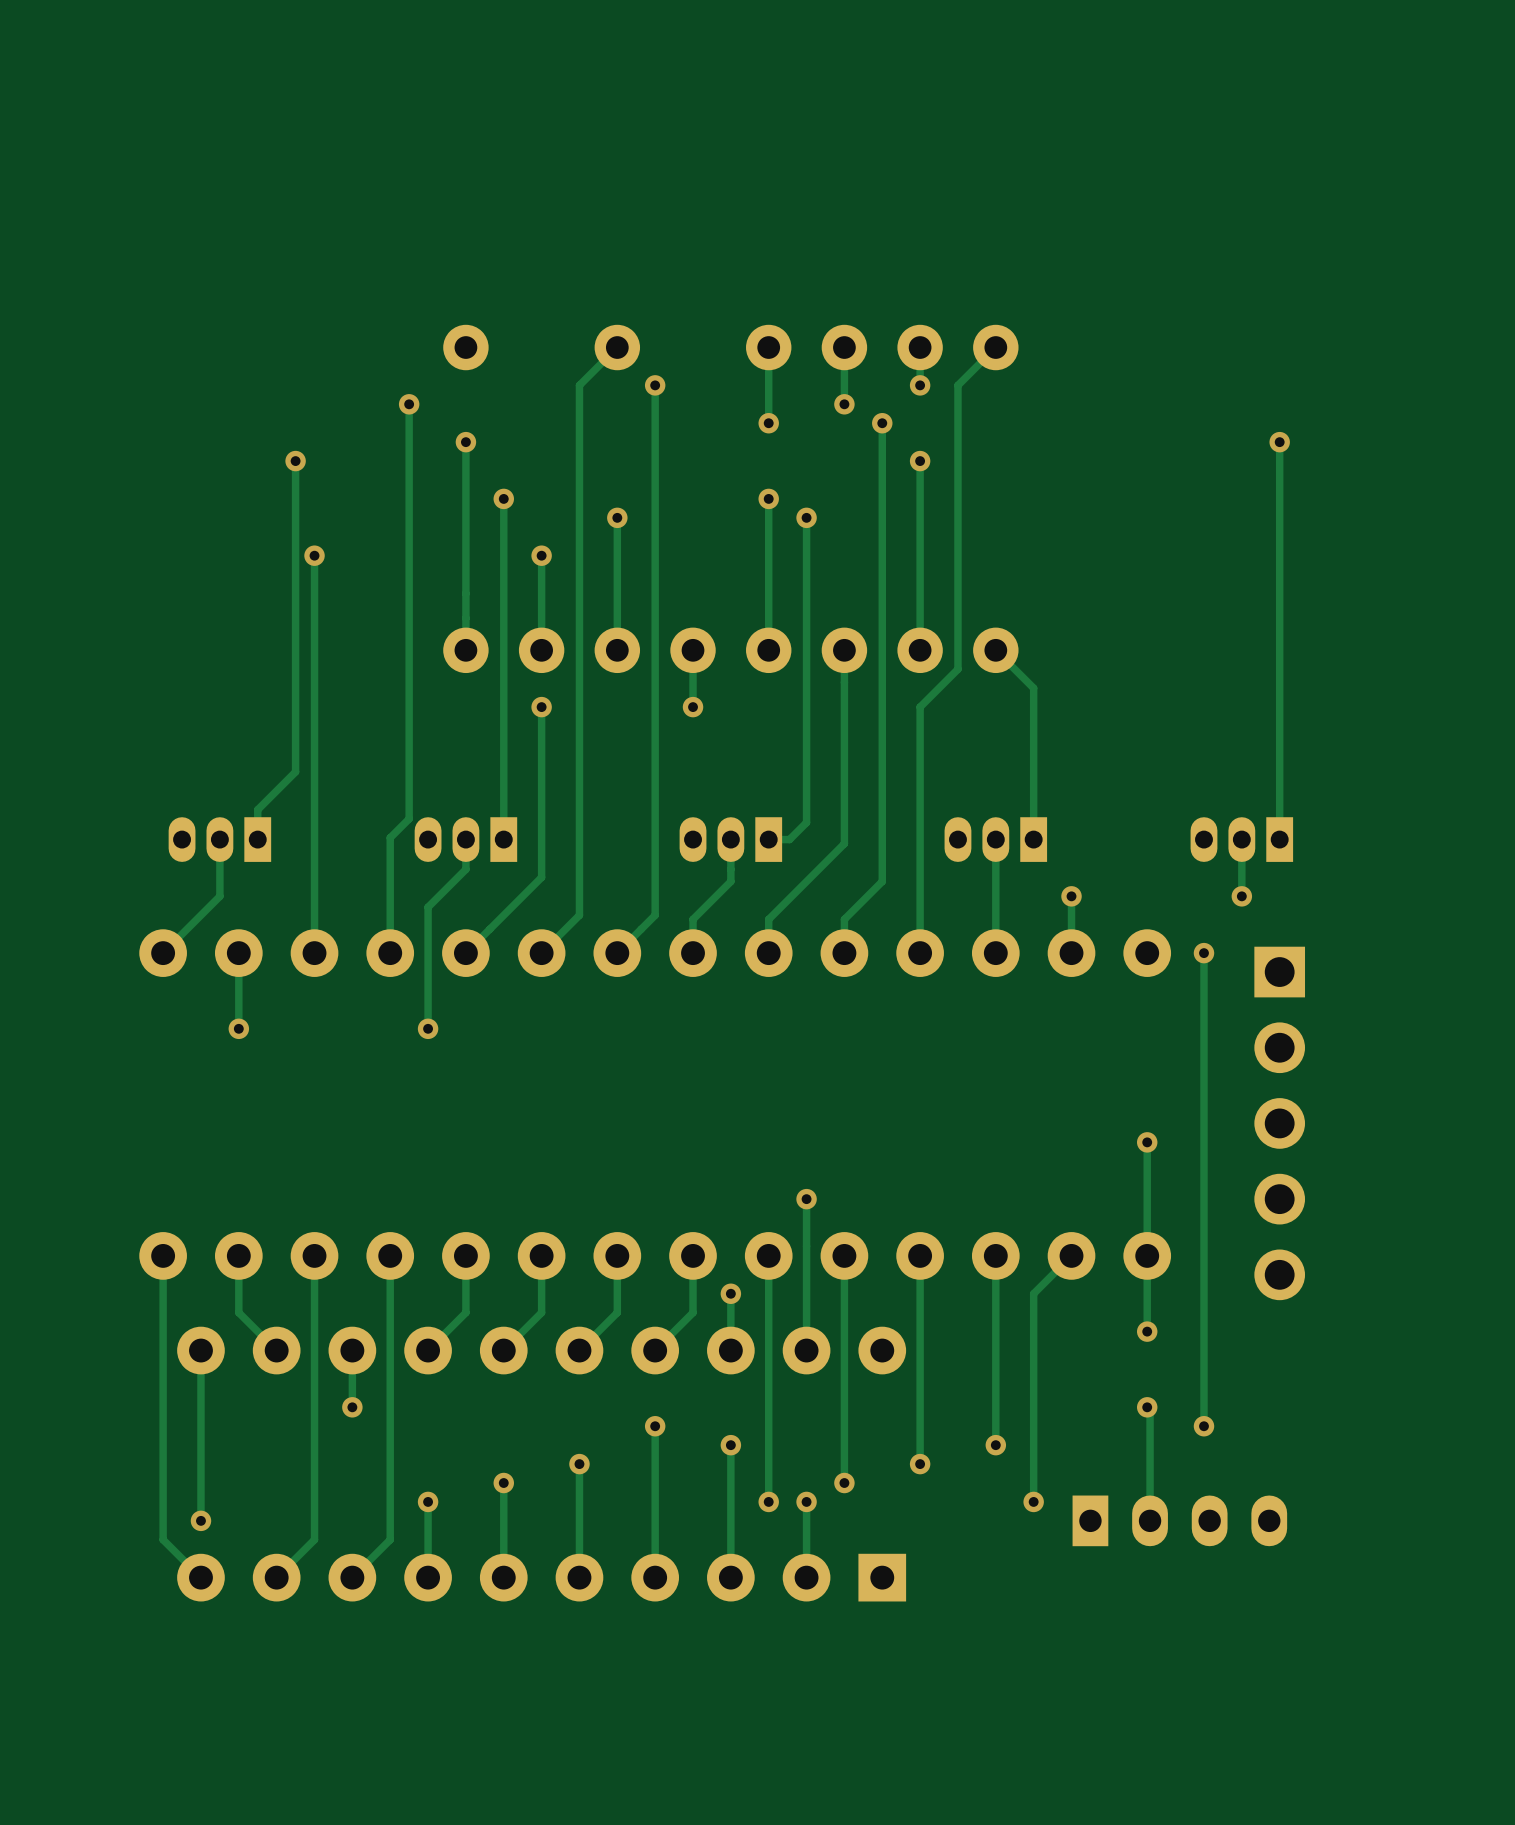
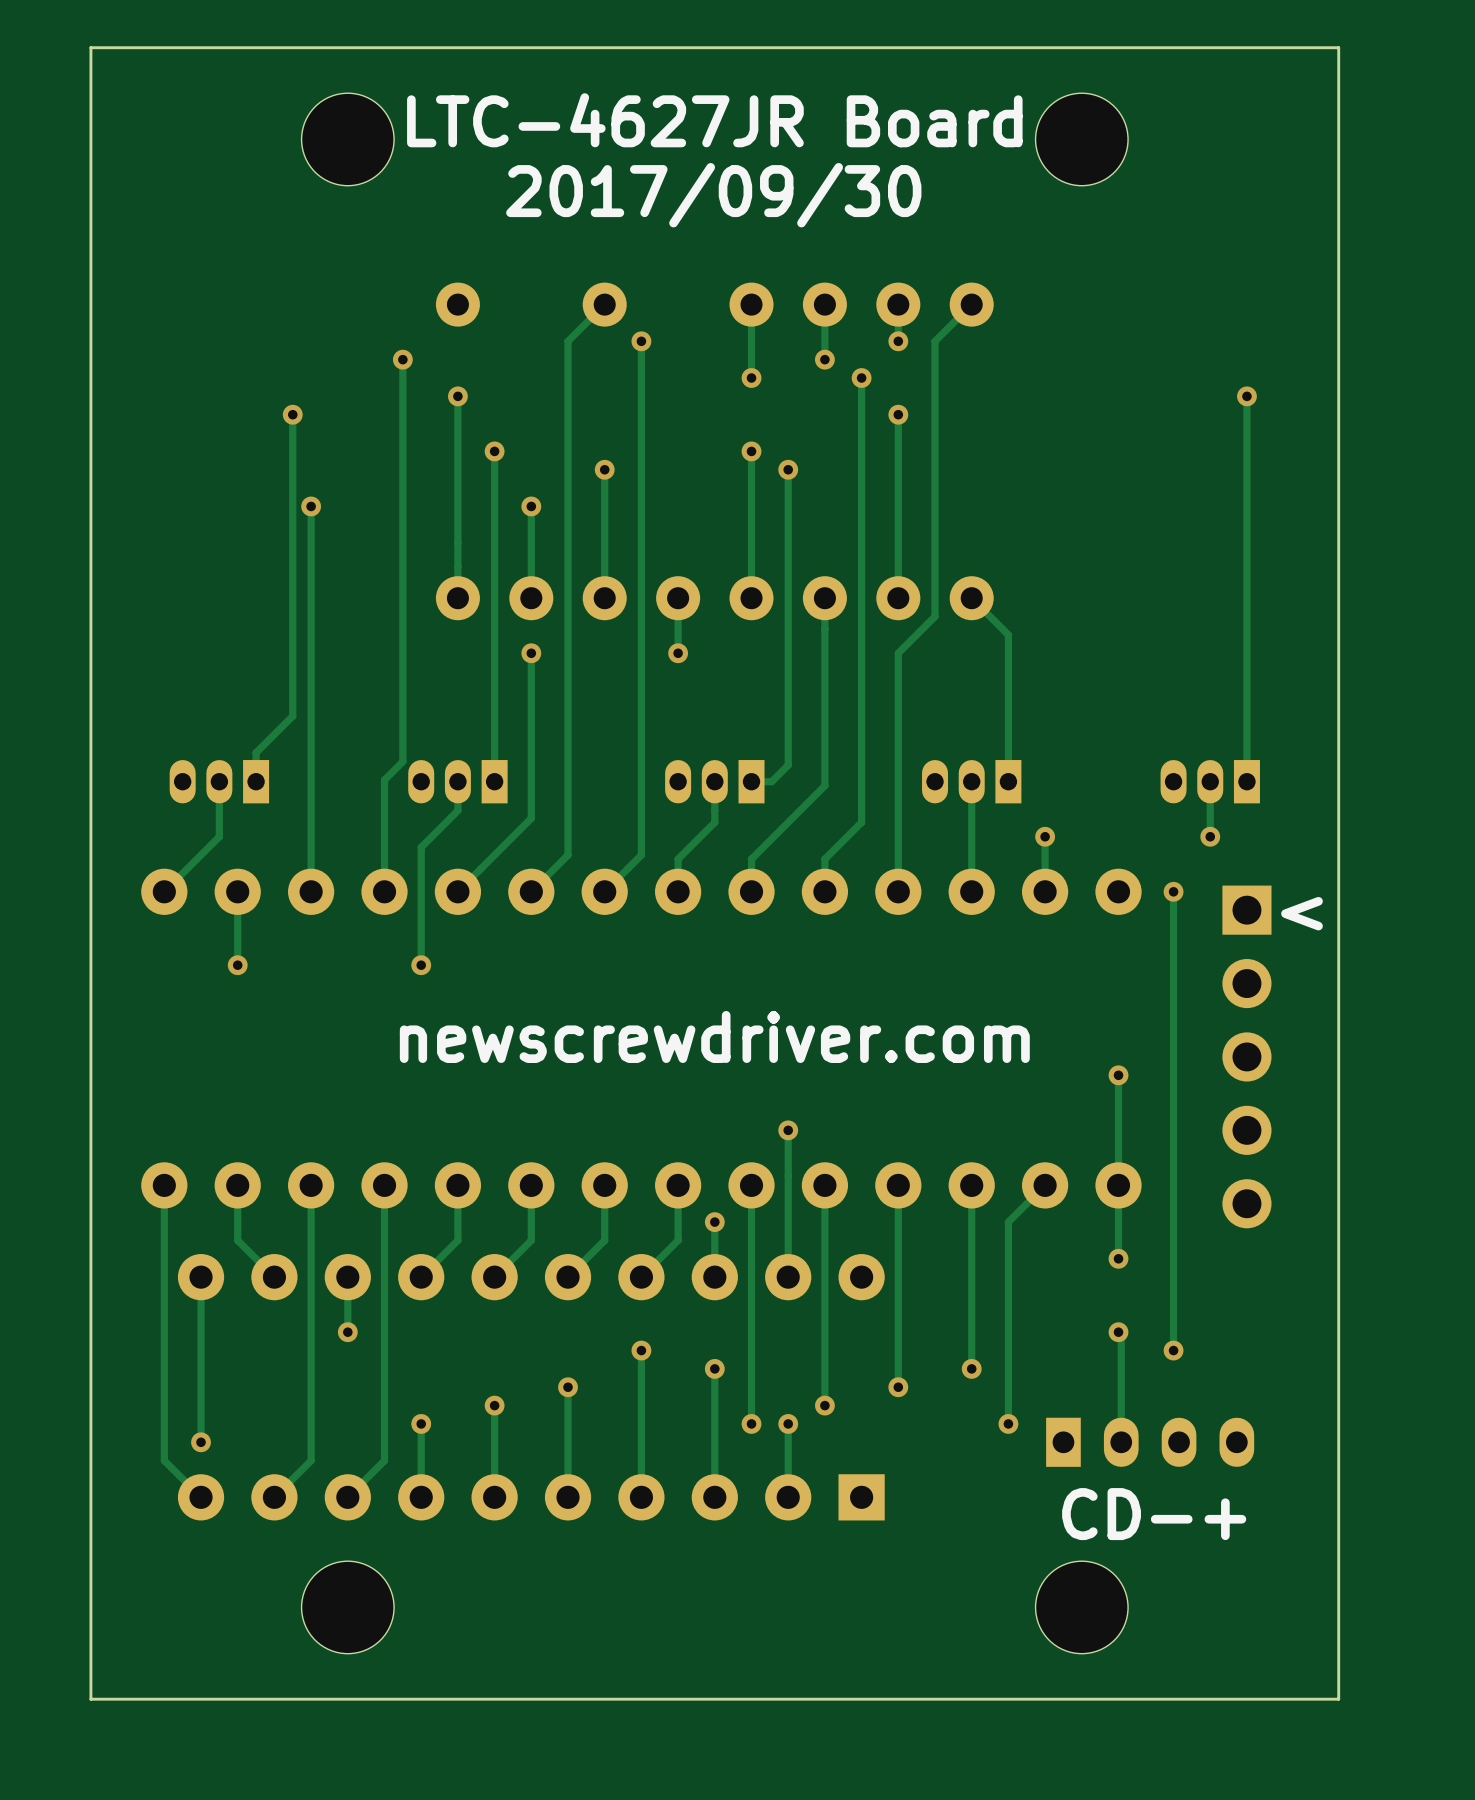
board edge: none -> (1338, 47) (1338, 1699) (90, 1699) (90, 47) (1338, 47)
text: none -> LTC-4627JR Board (714, 120)
part: none -> (347, 139)
part: none -> (1081, 139)
text: none -> 2017/09/30 (713, 195)
text: none -> < (1302, 913)
text: none -> newscrewdriver.com (714, 1036)
text: none -> CD-+ (1154, 1514)
part: none -> (347, 1607)
part: none -> (1081, 1607)

